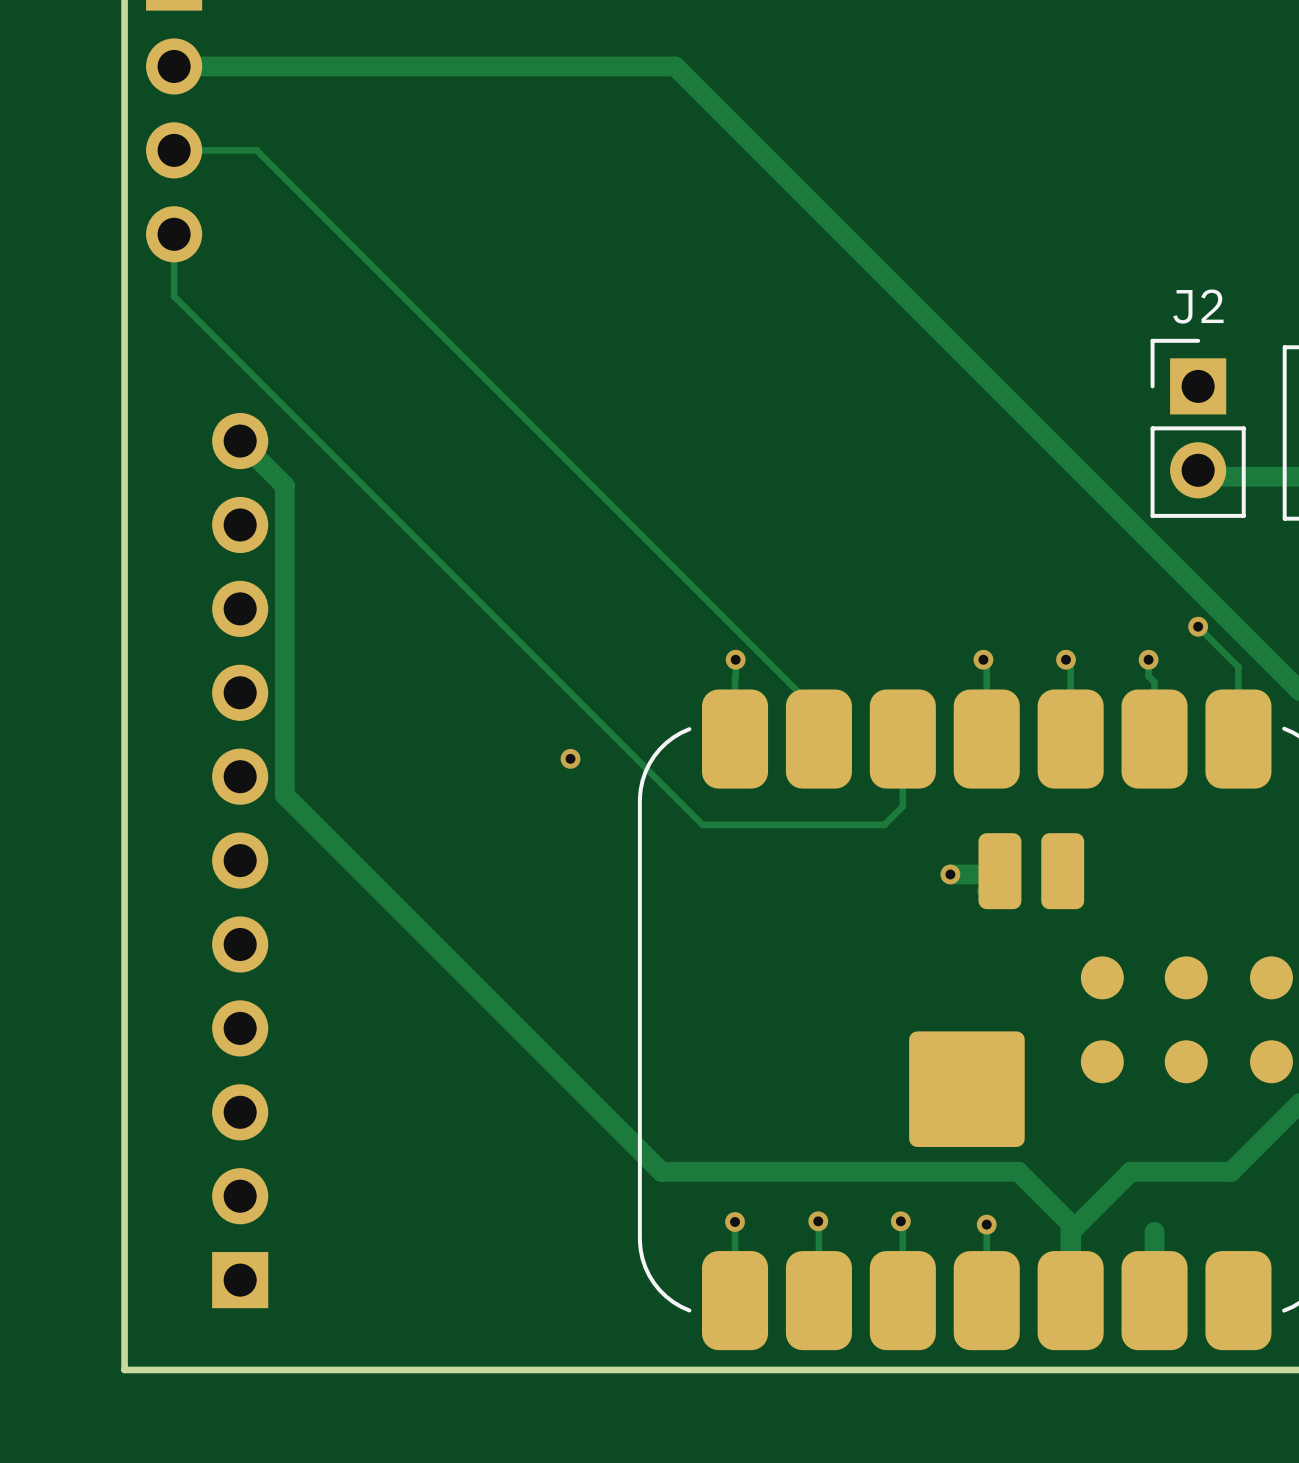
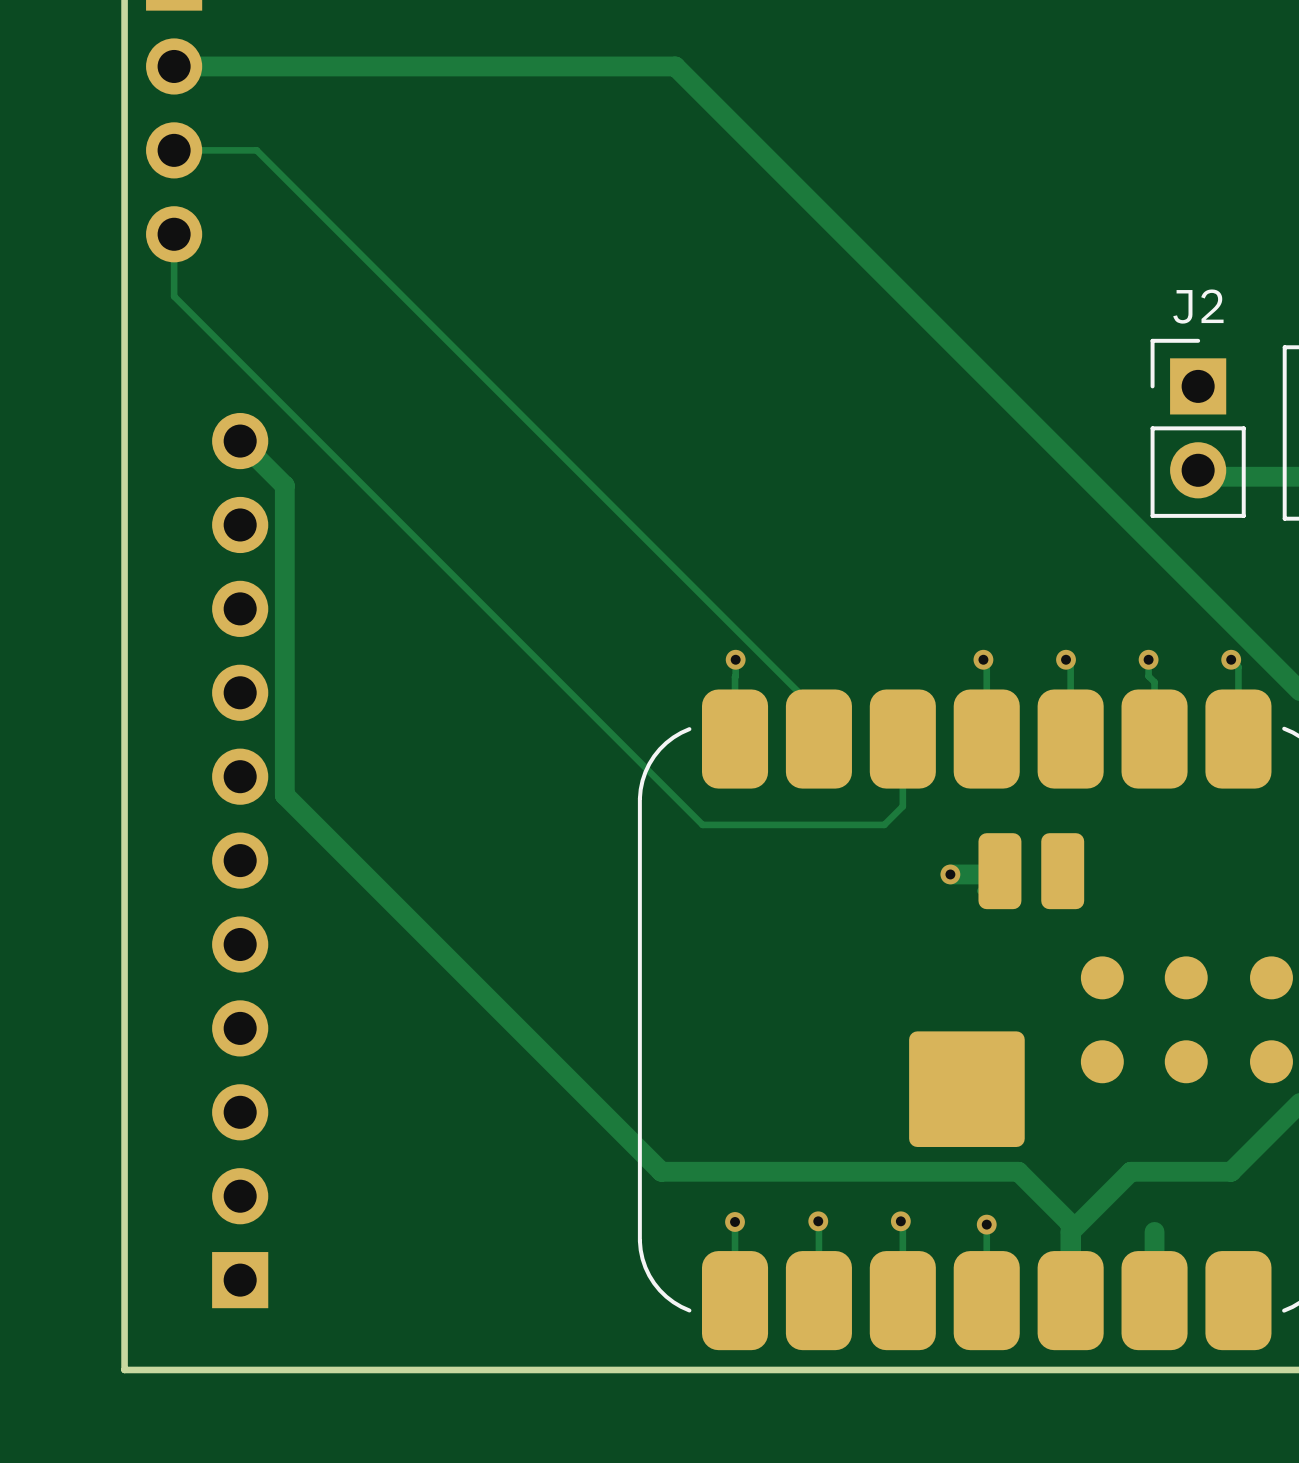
track: (1198, 626) (1231, 659) -> none
via position: (1198, 626) -> (1231, 659)
via: (570, 758) -> none

